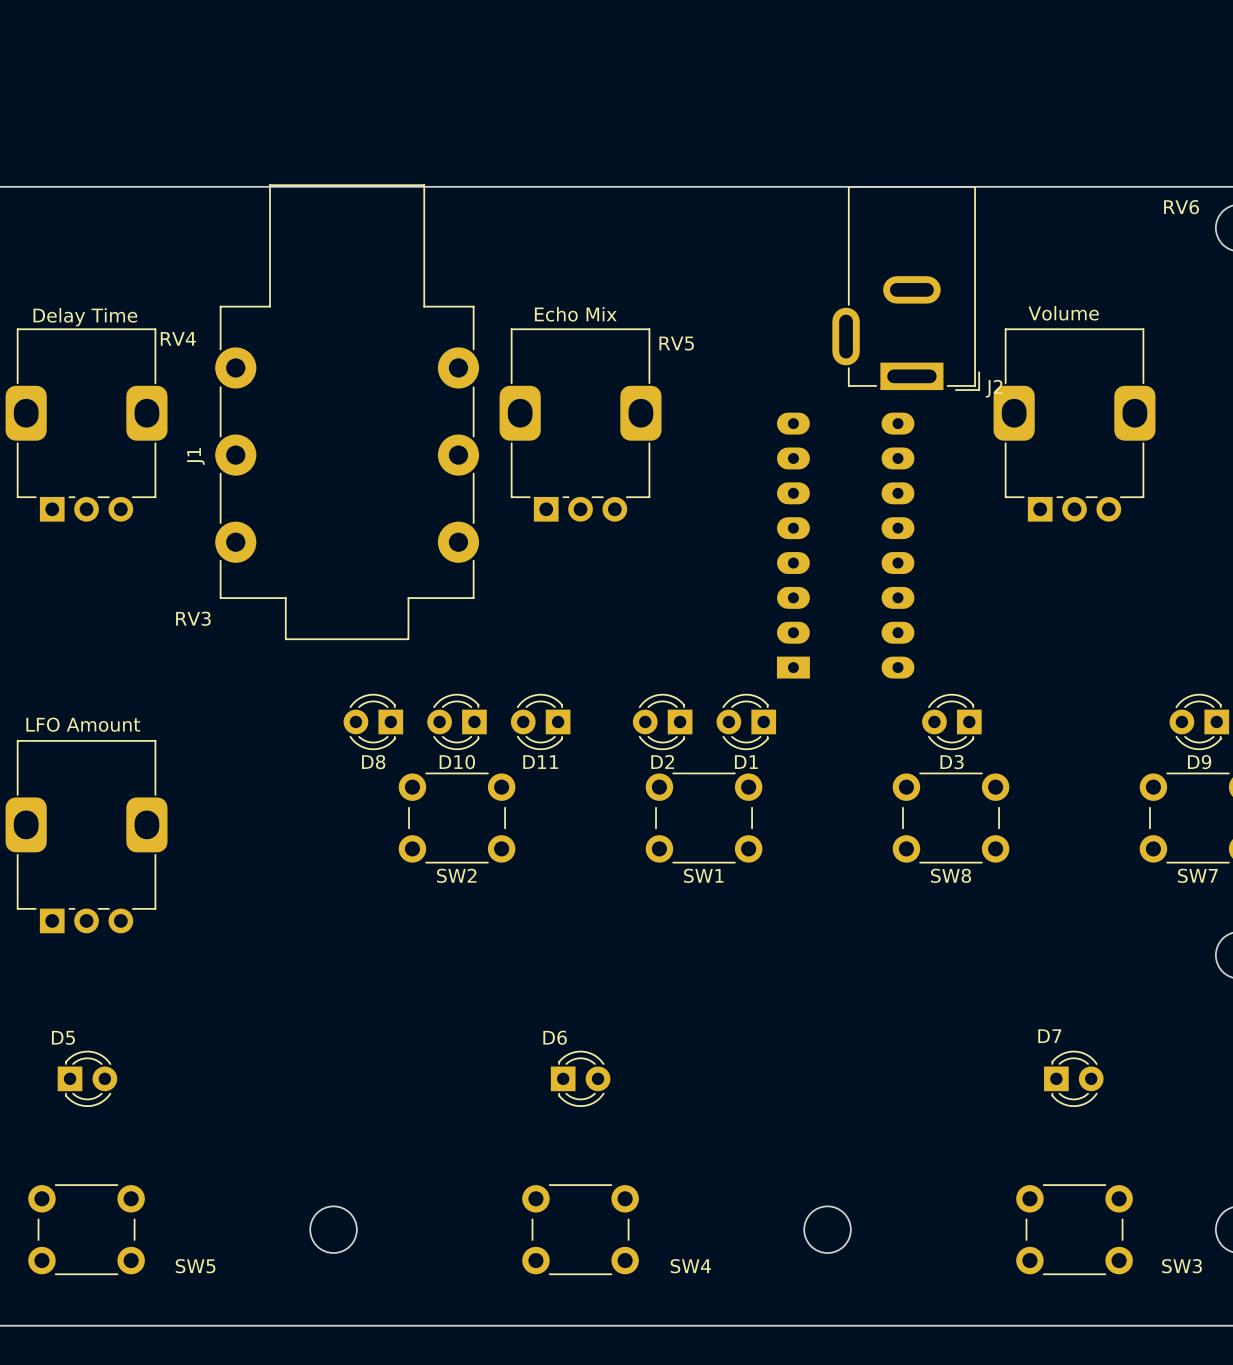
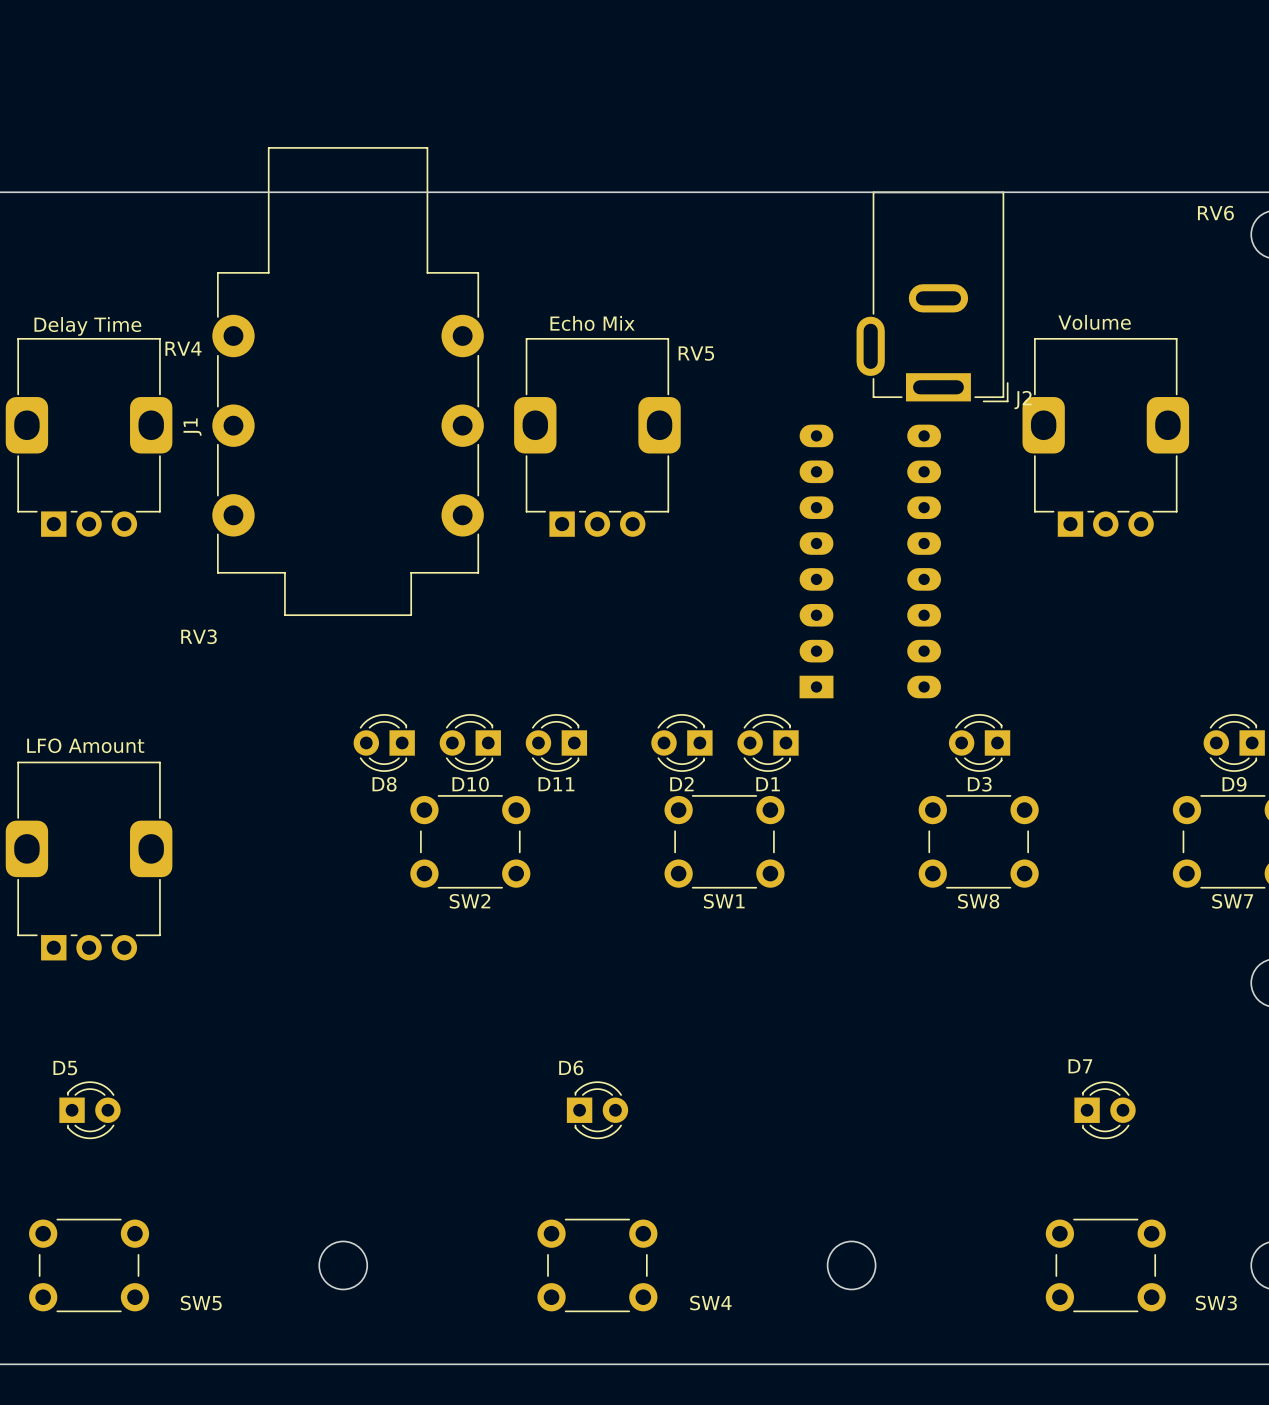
J1 position: (347, 412) -> (348, 381)

